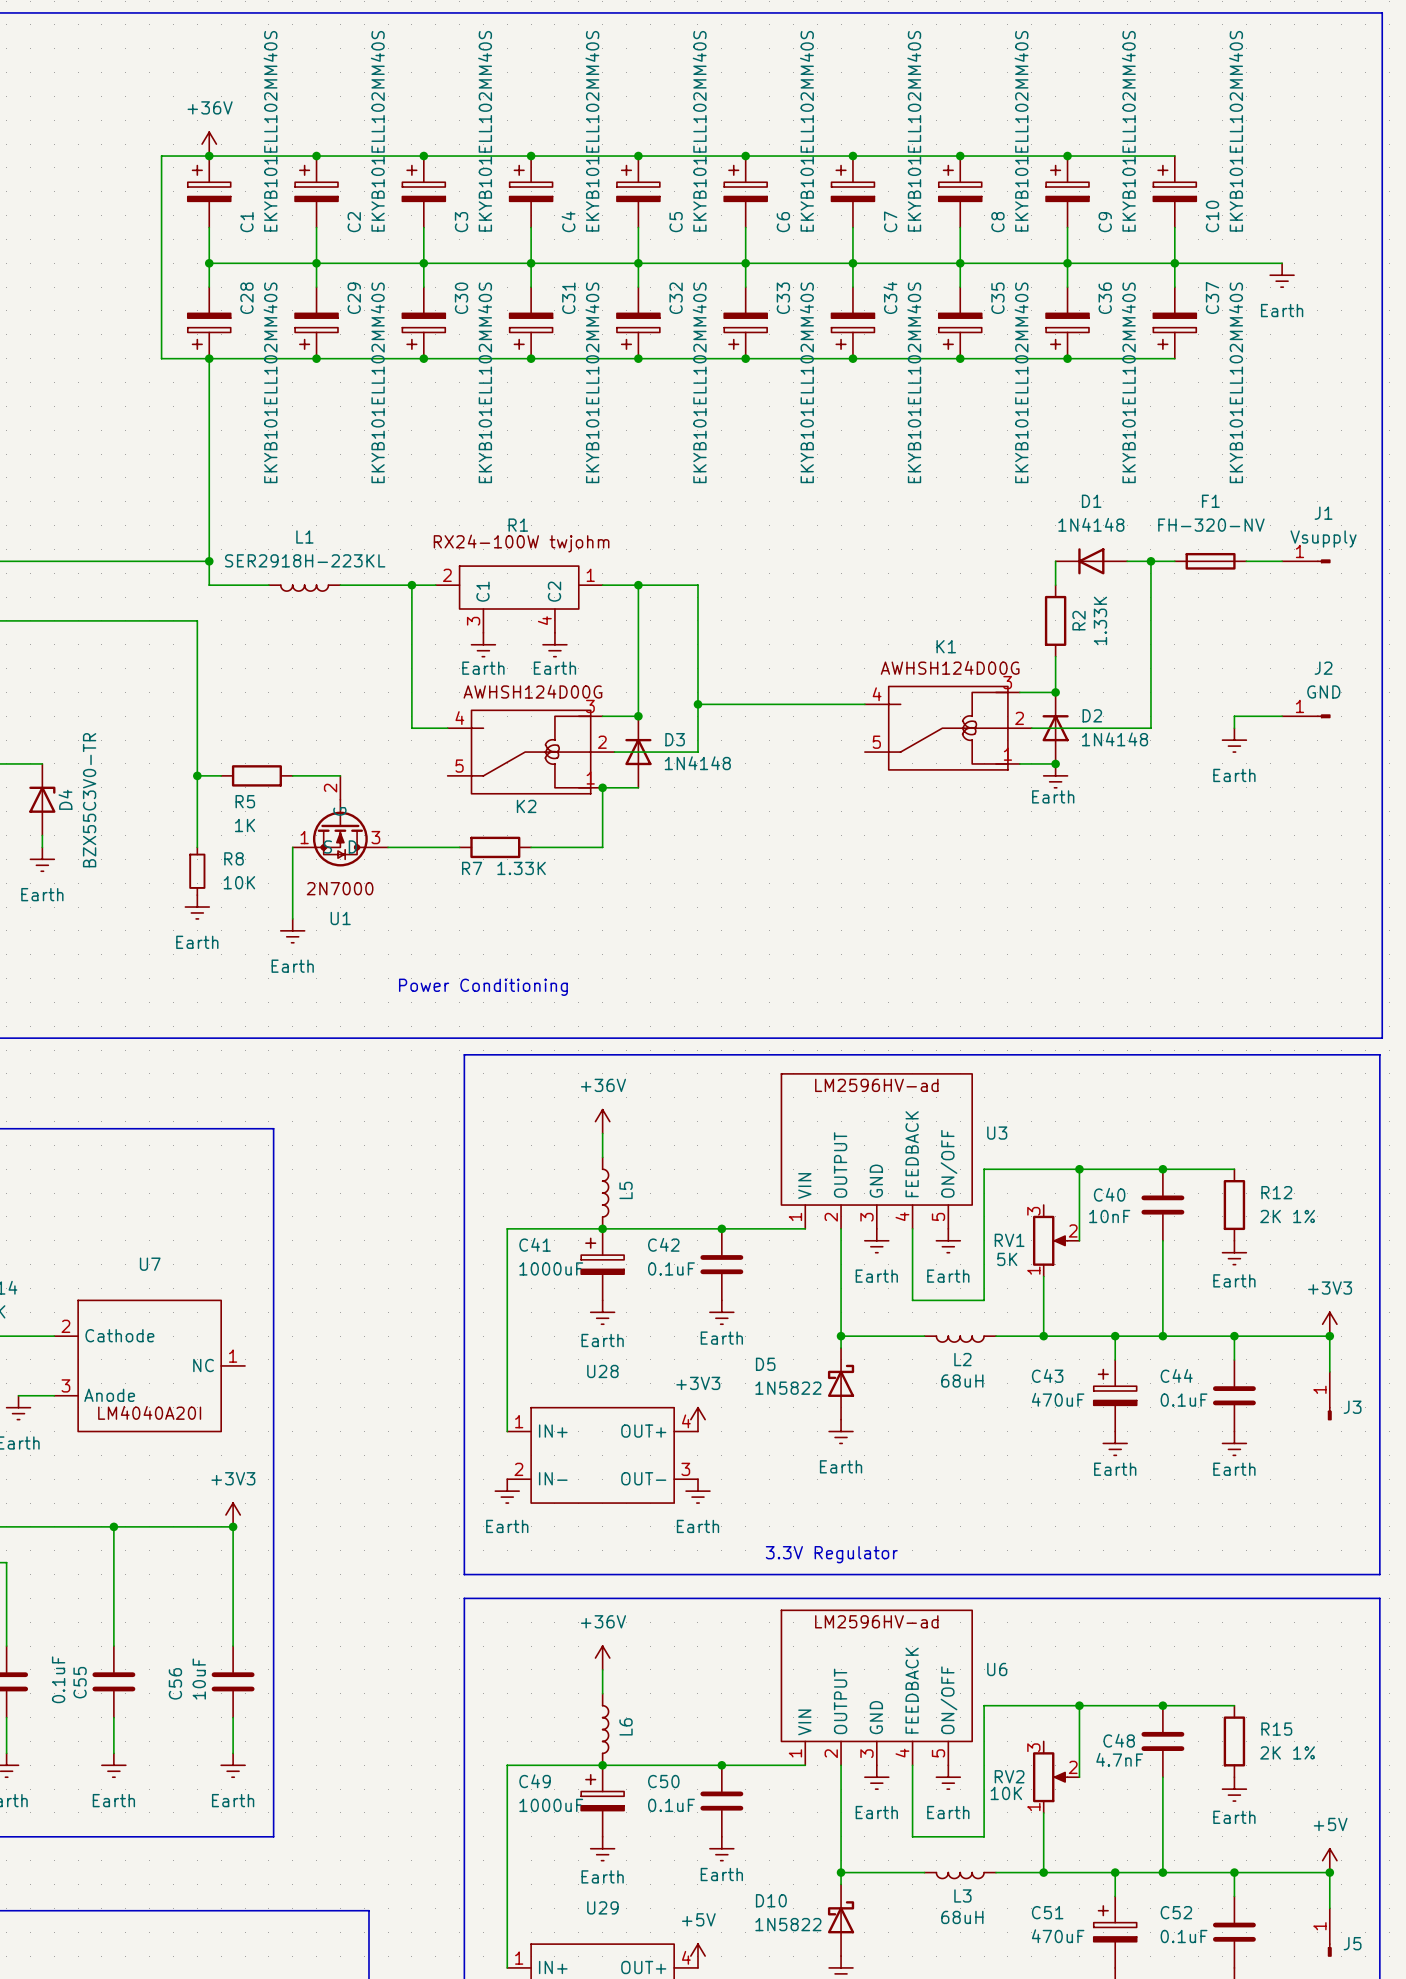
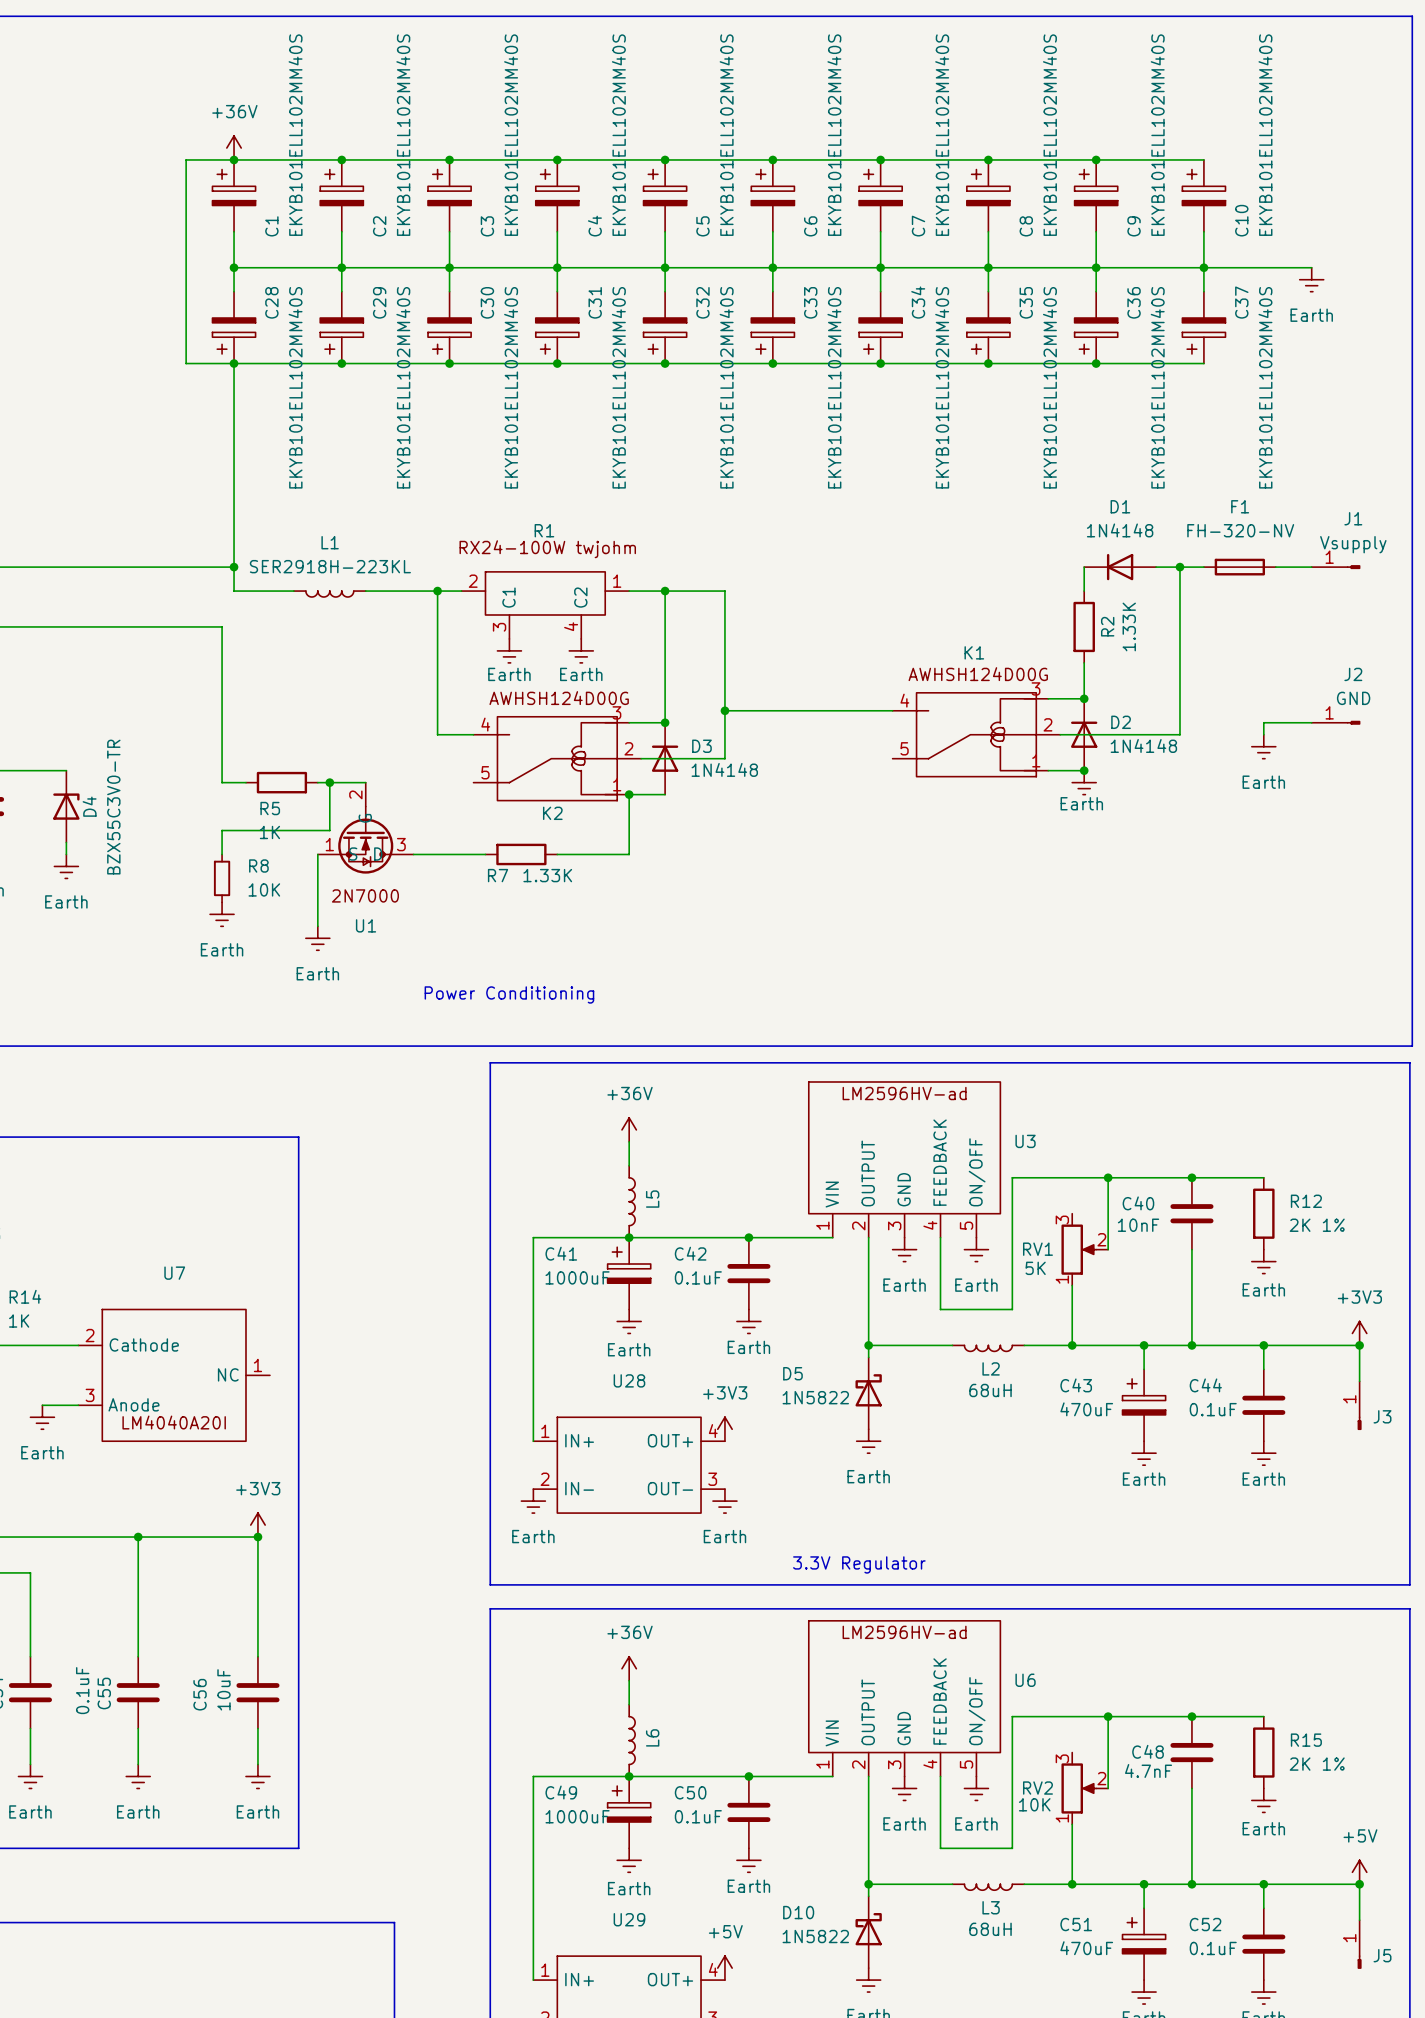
wire: (197, 775) (197, 823) -> (329, 782) (329, 830) (222, 830)
junction: (197, 775) -> none
junction: none -> (329, 782)

